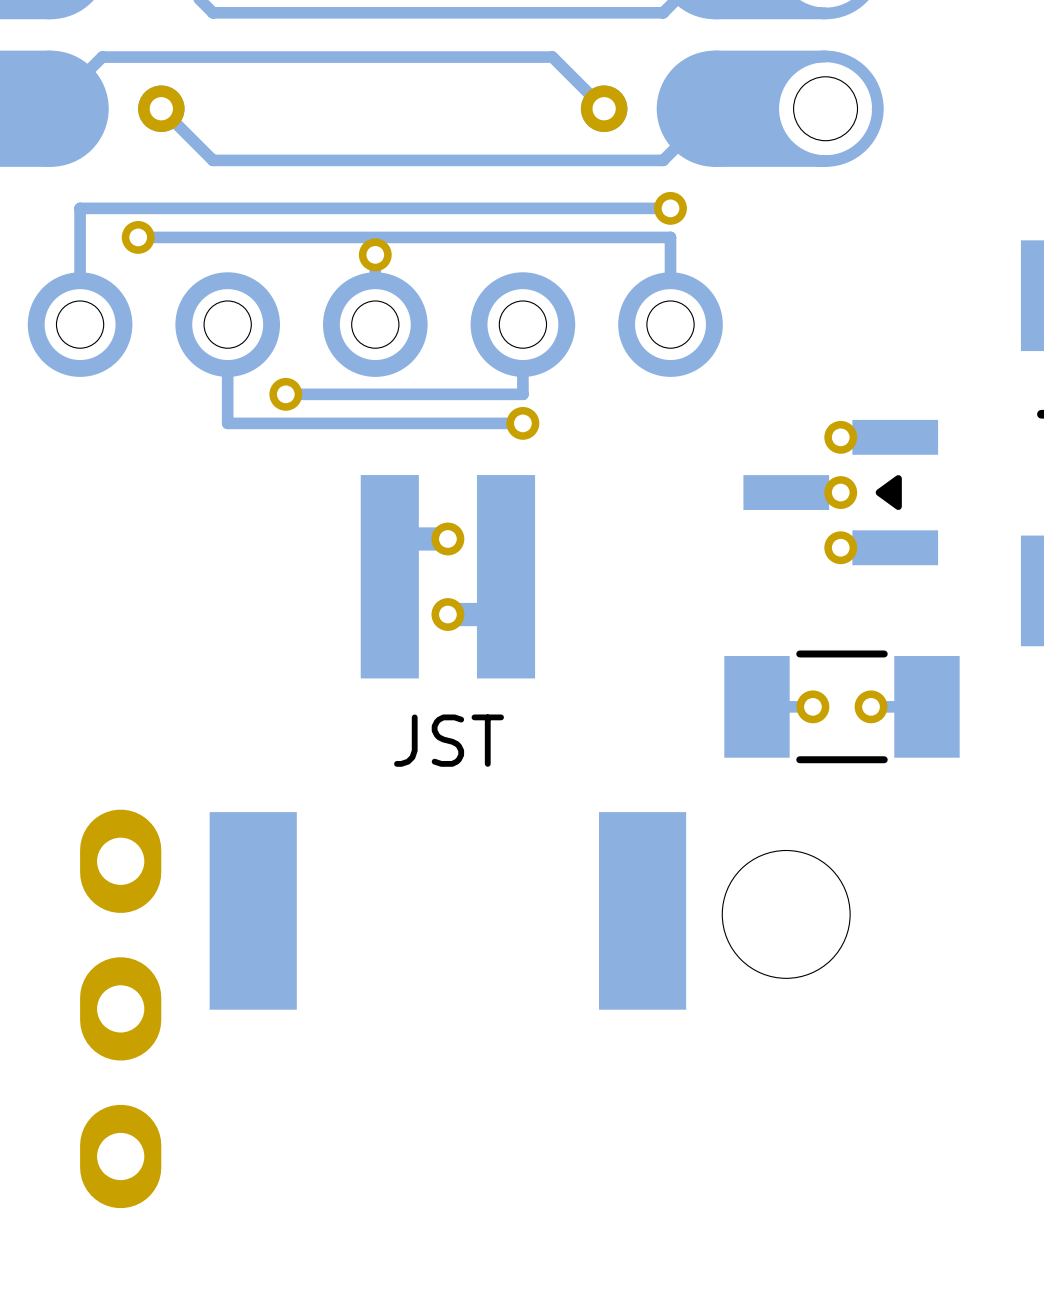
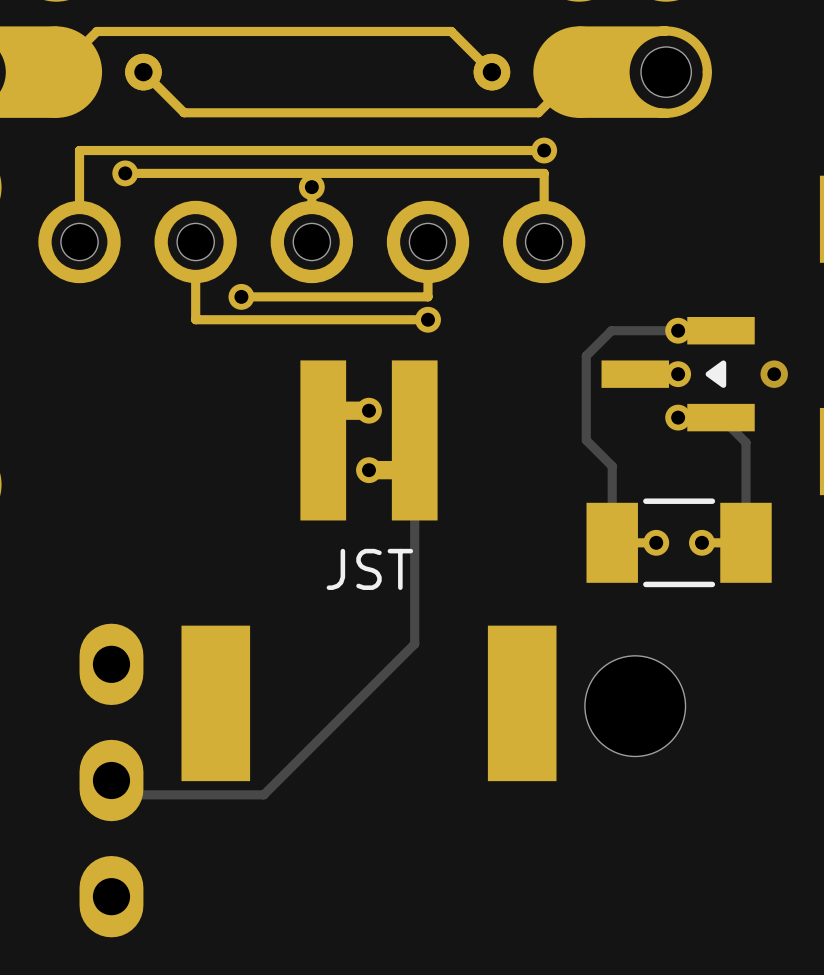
track: none -> (721, 330) (611, 330) (586, 355) (586, 440) (612, 466) (612, 542)
via: none -> (774, 374)
track: none -> (721, 417) (745, 442) (745, 542)
track: none -> (414, 440) (414, 643) (263, 794) (125, 794) (111, 780)

